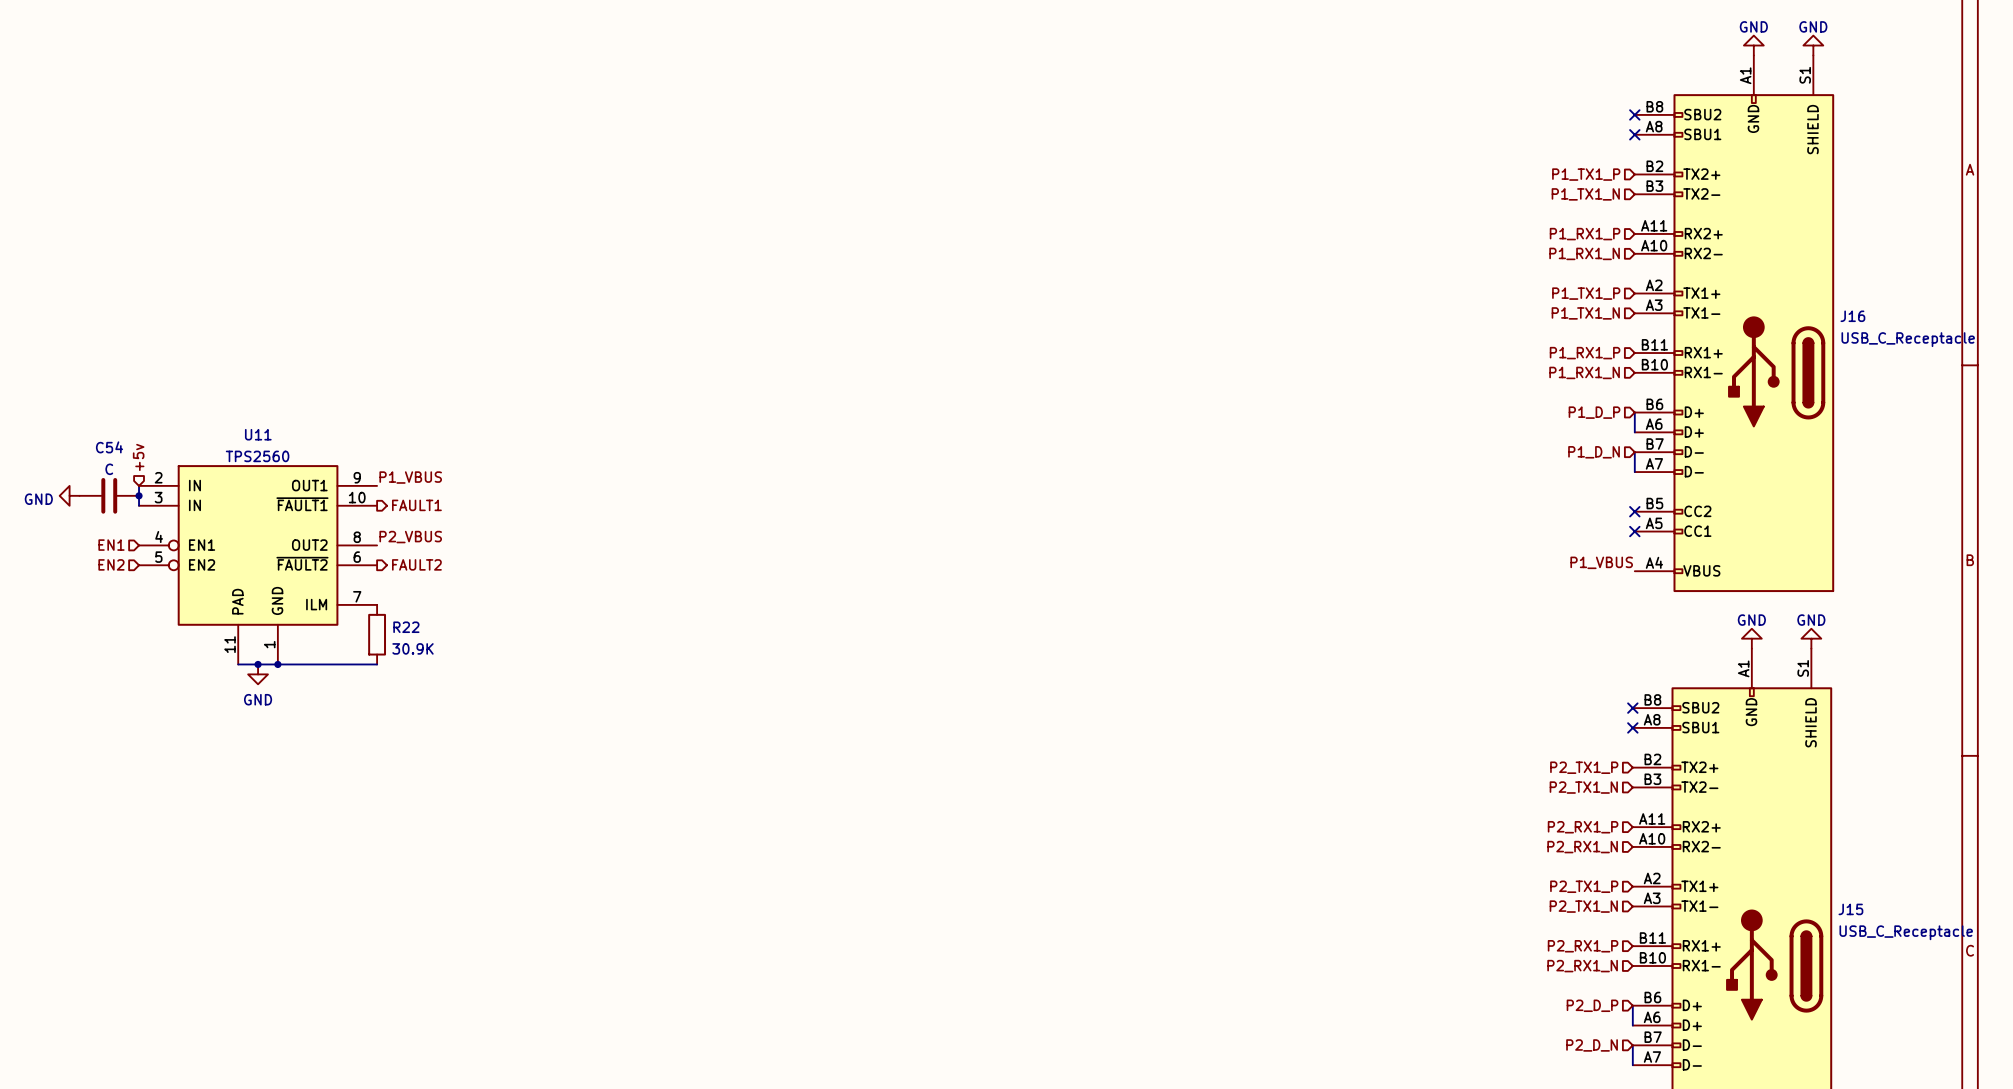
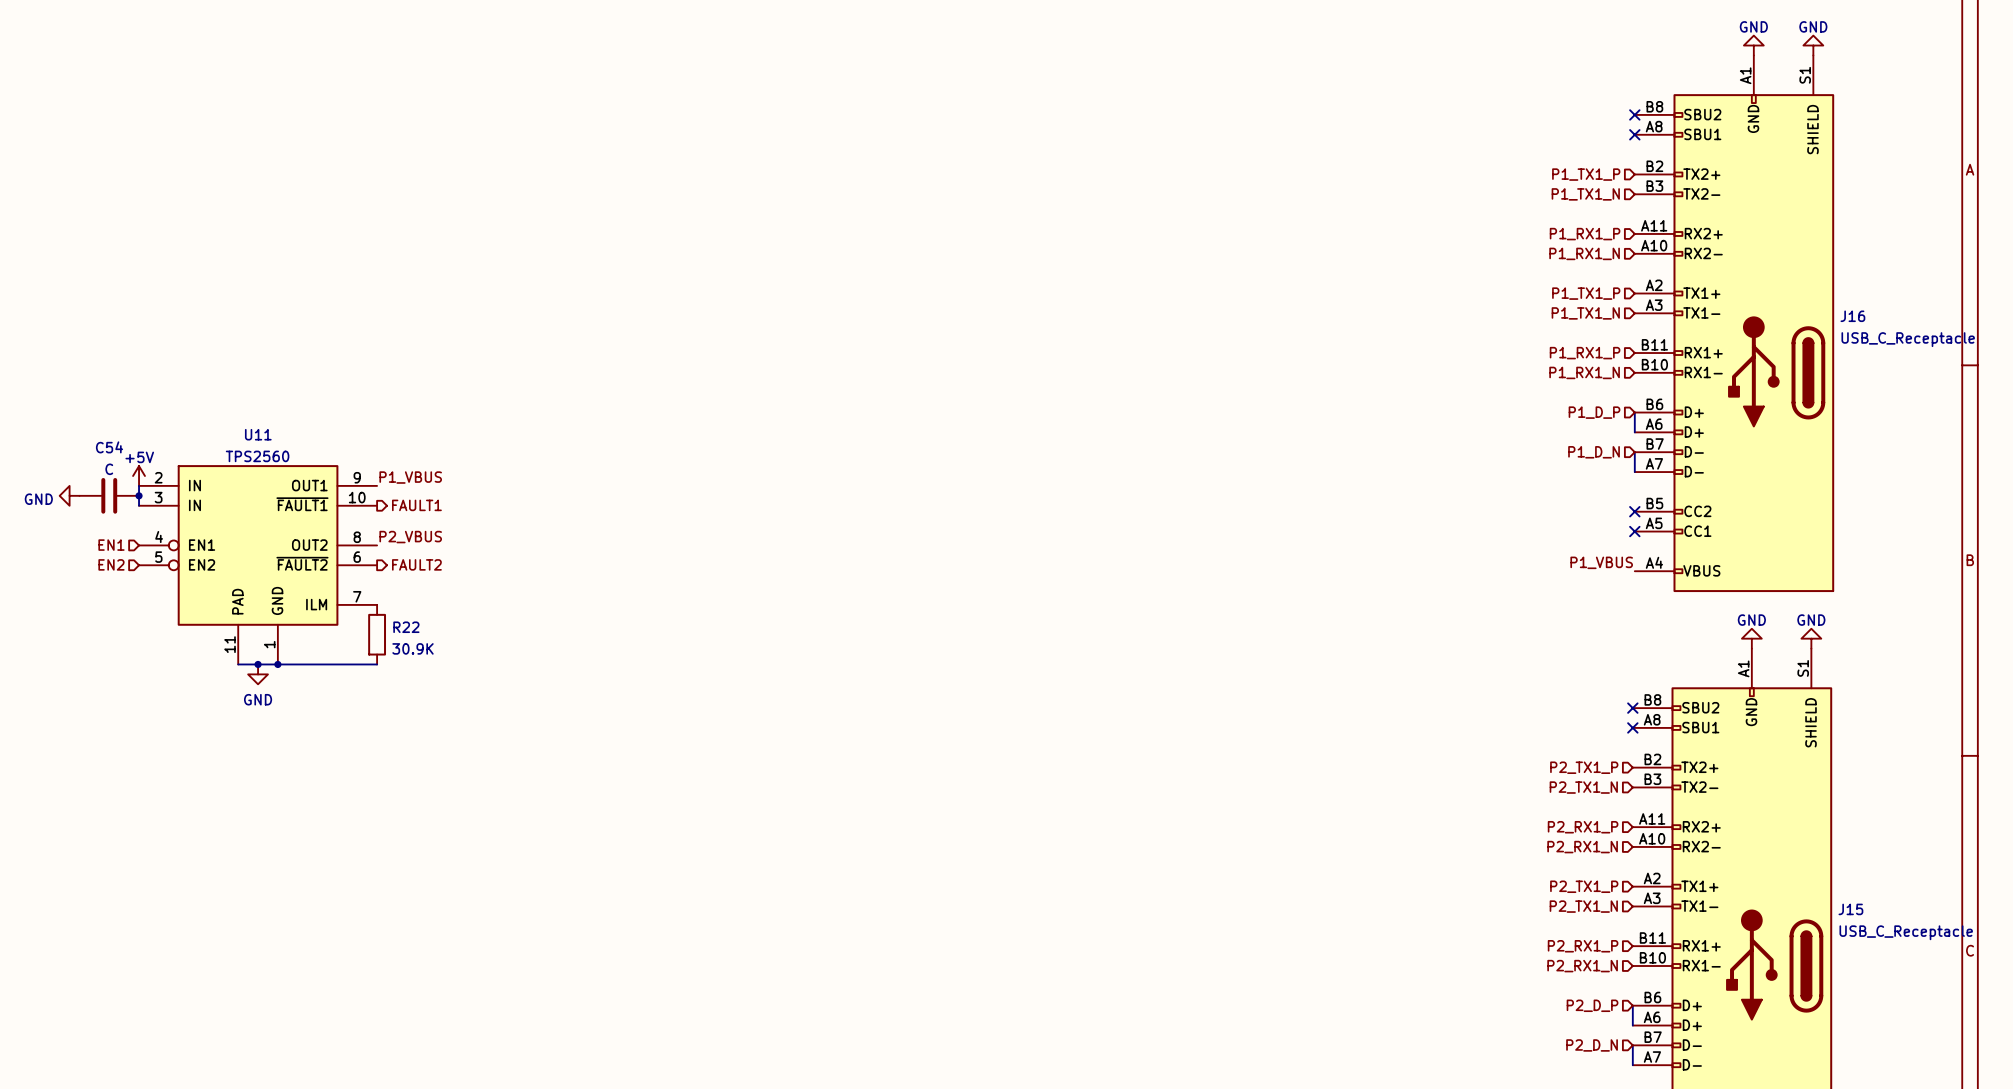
hierarchical label: +5v (138, 457) -> none
power symbol: none -> +5V (139, 476)

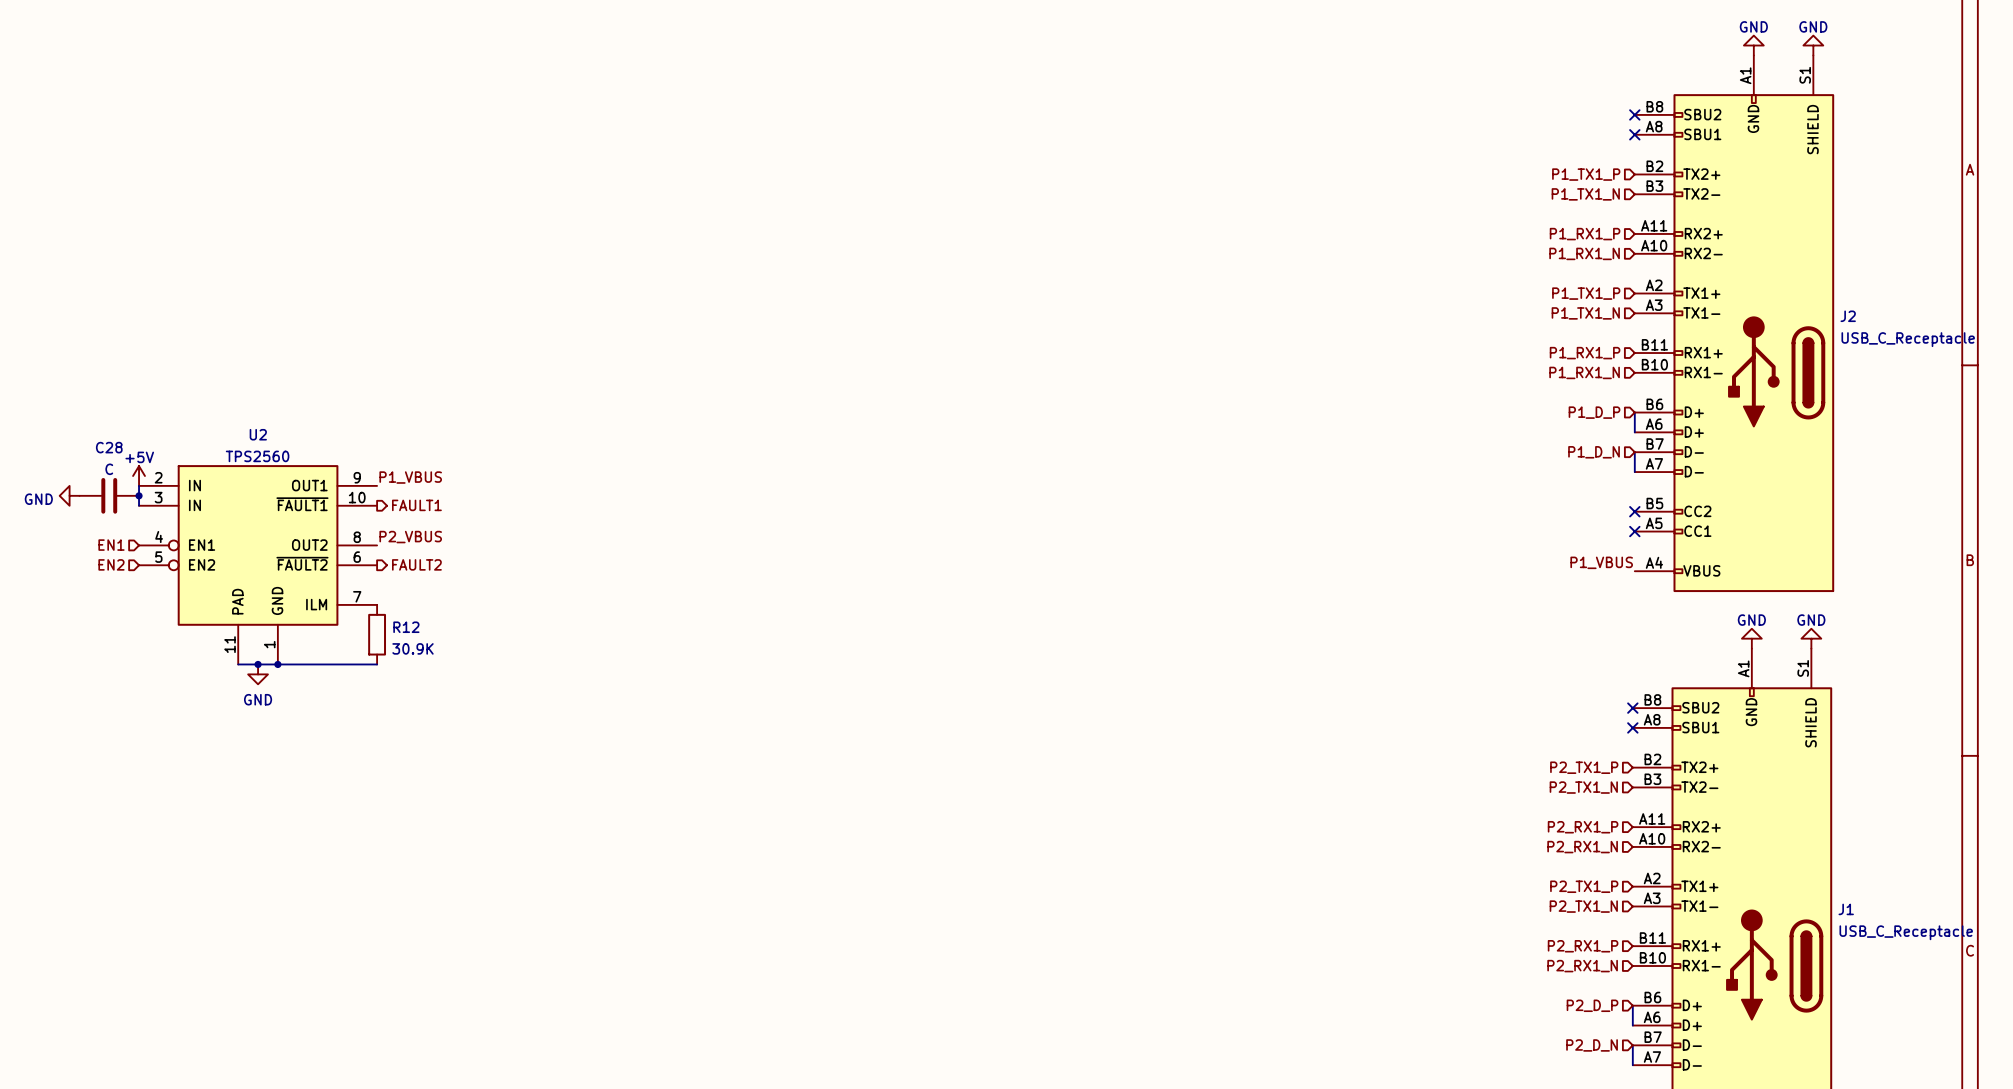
J16 name: J16 (1852, 316) -> J2 (1848, 316)
U11 name: U11 (258, 434) -> U2 (258, 434)
C54 name: C54 (109, 447) -> C28 (109, 447)
R22 name: R22 (406, 627) -> R12 (406, 627)
J15 name: J15 (1850, 909) -> J1 (1846, 909)

